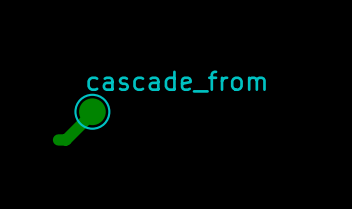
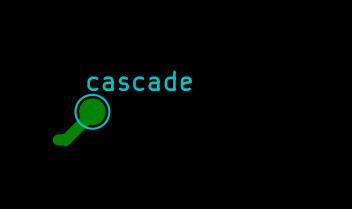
text: cascade_from (176, 81) -> cascade (139, 80)

